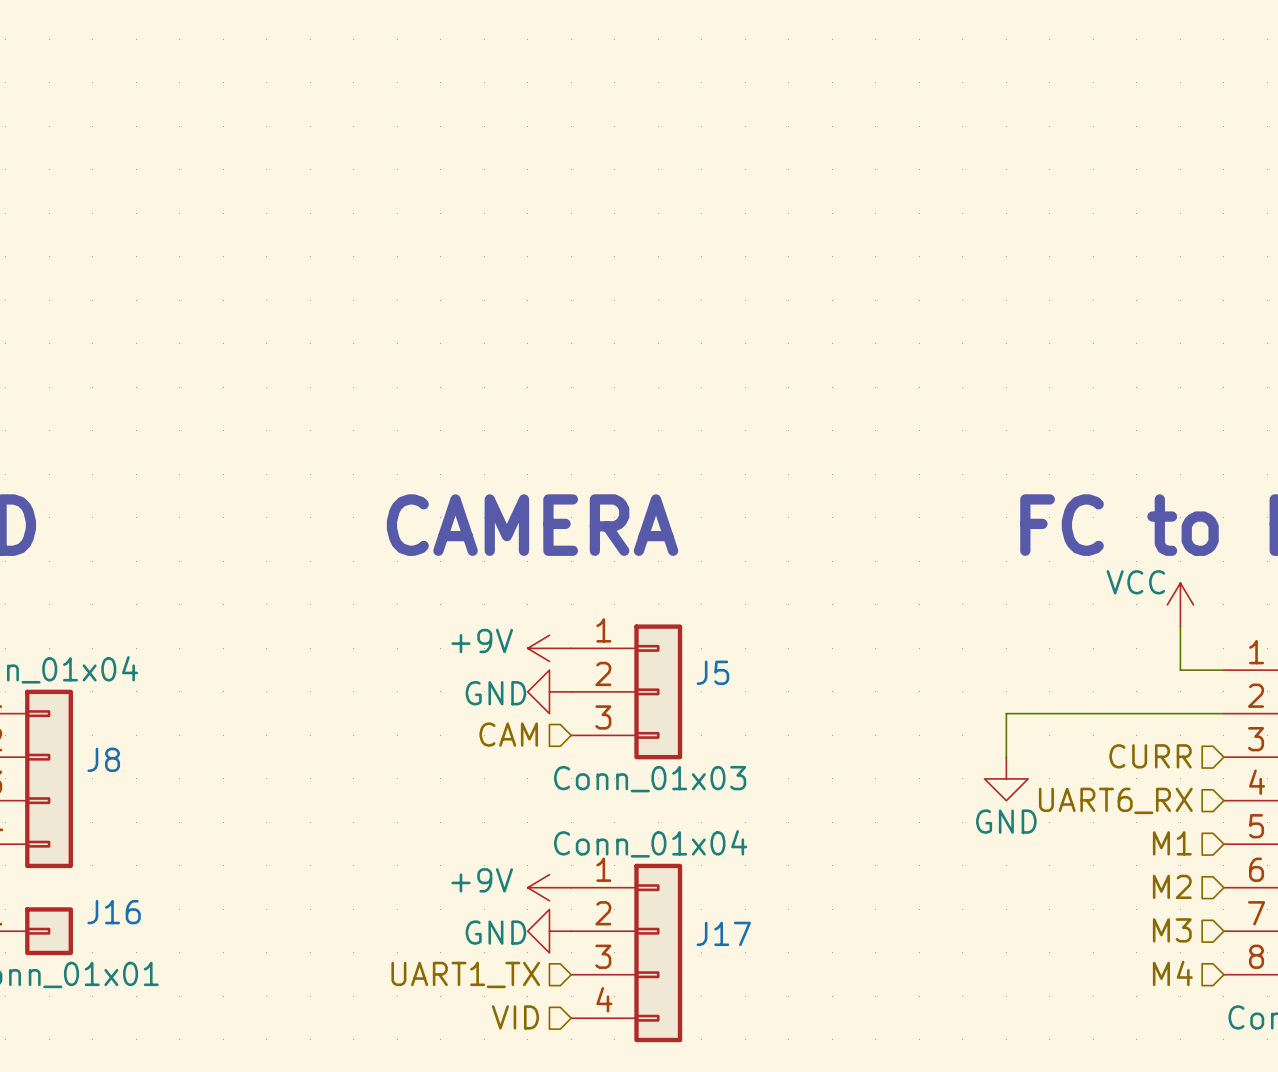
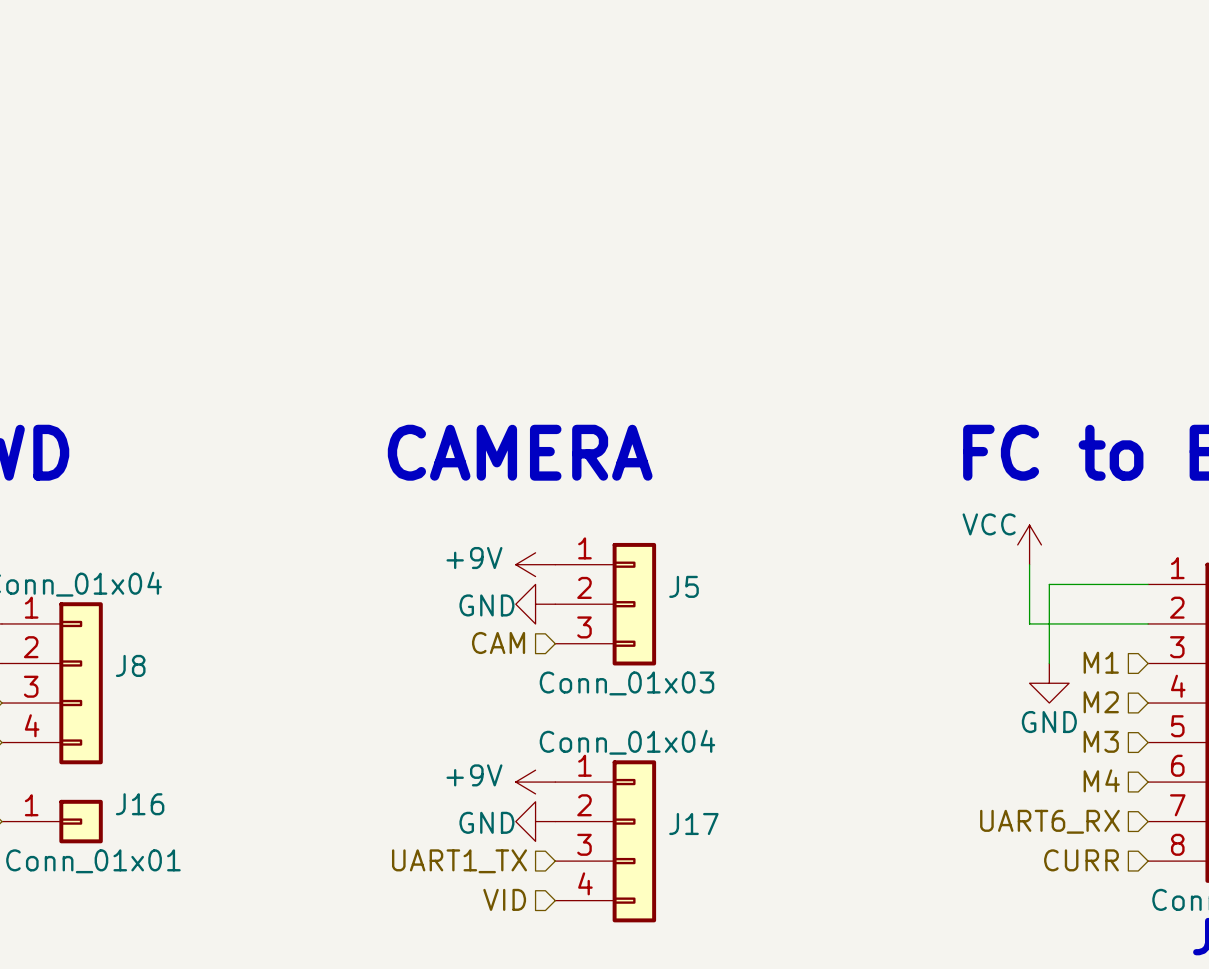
power symbol position: VCC (1180, 604) -> VCC (1029, 544)
wire: (1180, 626) (1180, 670) -> (1049, 663) (1049, 584) (1108, 584)
wire: (1093, 713) (1006, 713) (1006, 757) -> (1029, 623) (1029, 564)
hierarchical label: CURR (1150, 756) -> M1 (1101, 662)
power symbol position: GND (1006, 778) -> GND (1049, 683)
hierarchical label: UART6_RX (1115, 800) -> M2 (1101, 702)
hierarchical label: M1 (1172, 843) -> M3 (1101, 741)
hierarchical label: M2 (1172, 886) -> M4 (1101, 780)
hierarchical label: M3 (1172, 930) -> UART6_RX (1049, 821)
hierarchical label: M4 (1172, 973) -> CURR (1081, 860)

